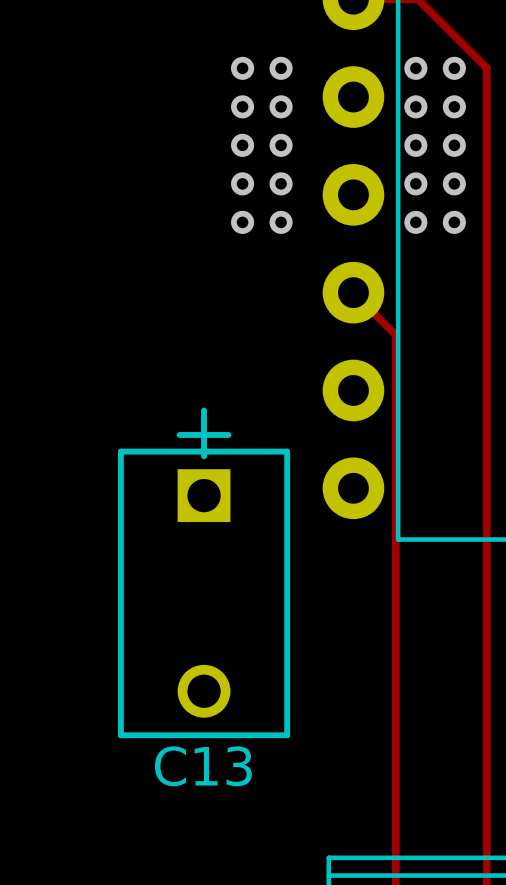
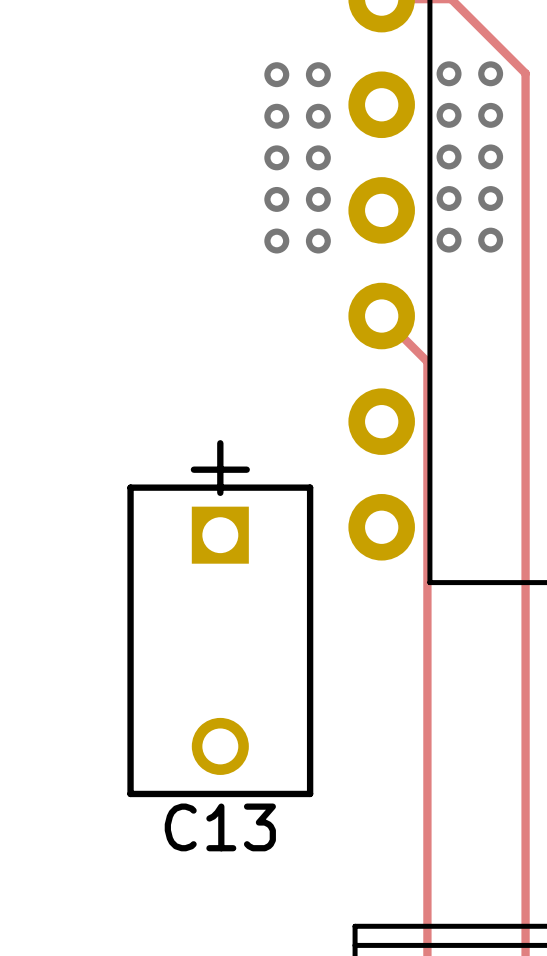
via position: (242, 68) -> (276, 74)
via position: (281, 68) -> (318, 74)
via position: (242, 106) -> (276, 116)
via position: (281, 106) -> (318, 116)
via position: (242, 145) -> (276, 157)
via position: (281, 145) -> (318, 157)
via position: (242, 183) -> (276, 199)
via position: (281, 183) -> (318, 199)
via position: (242, 222) -> (276, 241)
via position: (281, 222) -> (318, 241)

